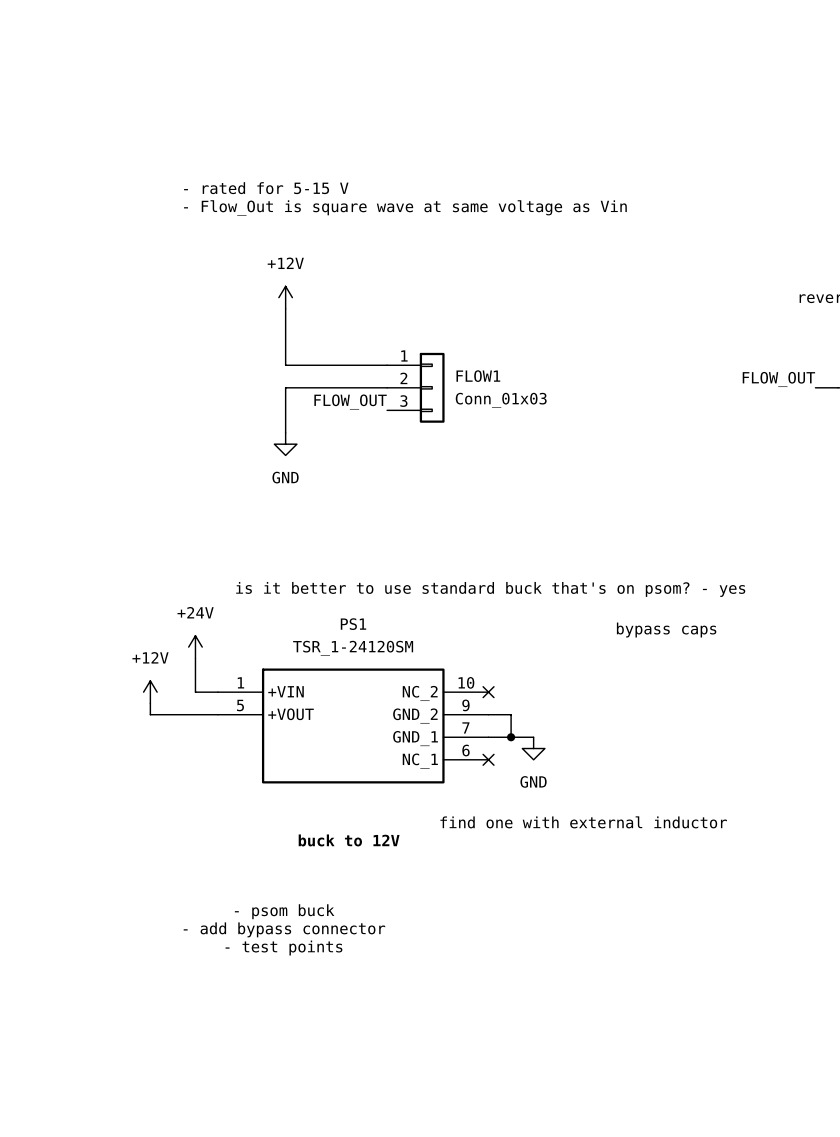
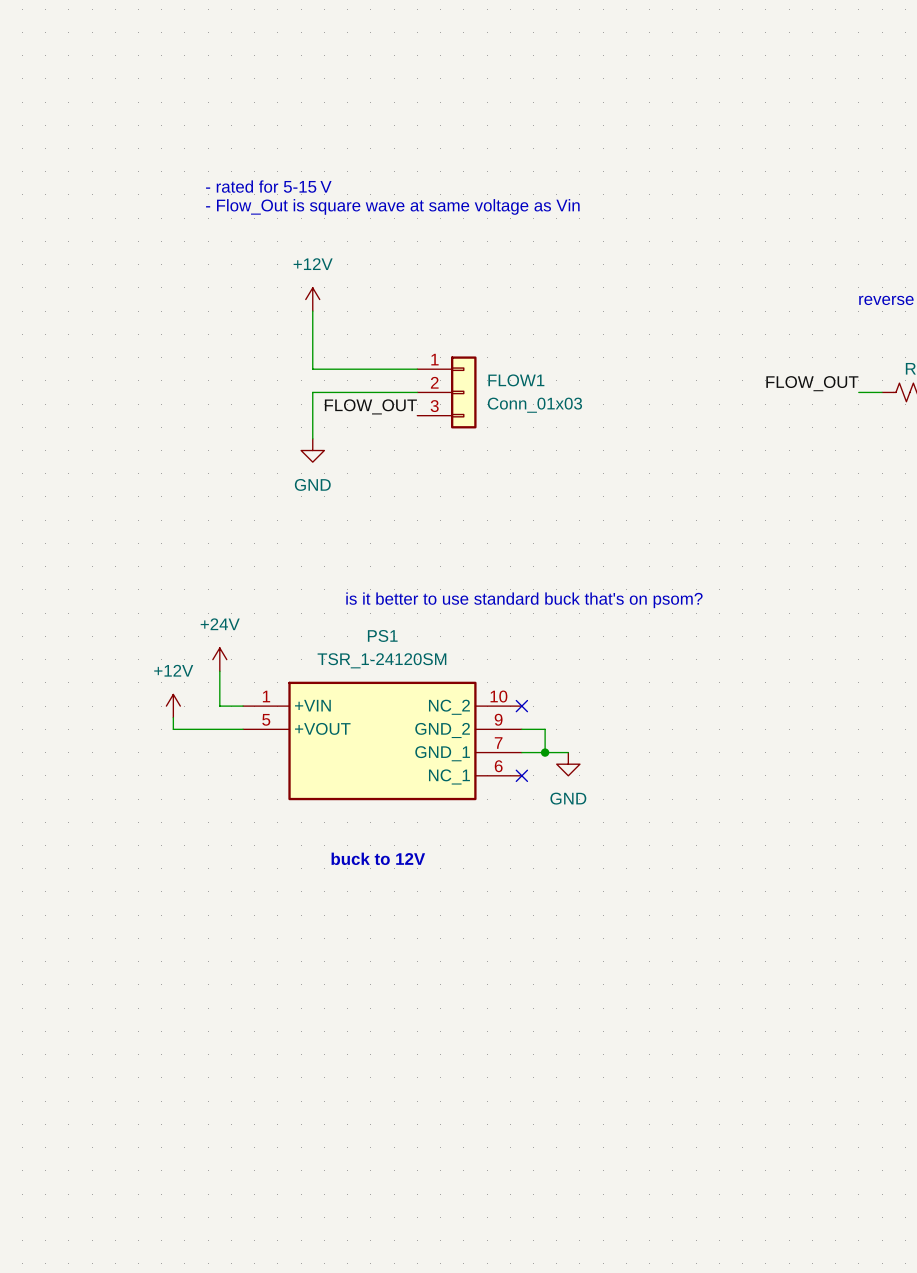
text: is it better to use standard buck that's on psom? - yes (490, 589) -> is it better to use standard buck that's on psom? (524, 600)
text: bypass caps (666, 630) -> none
text: find one with external inductor (583, 822) -> none
text: - psom buck (284, 911) -> none
text: - add bypass connector (284, 929) -> none
text: - test points (283, 948) -> none

